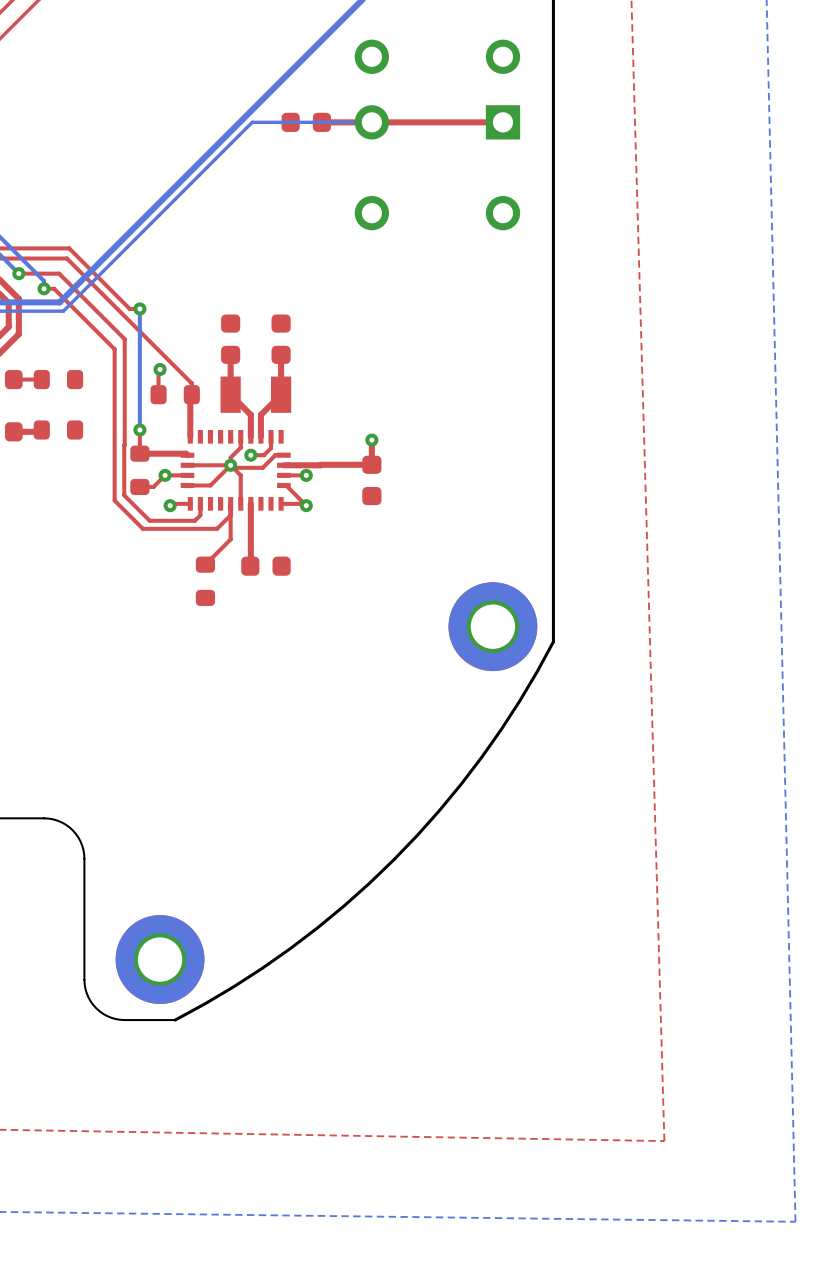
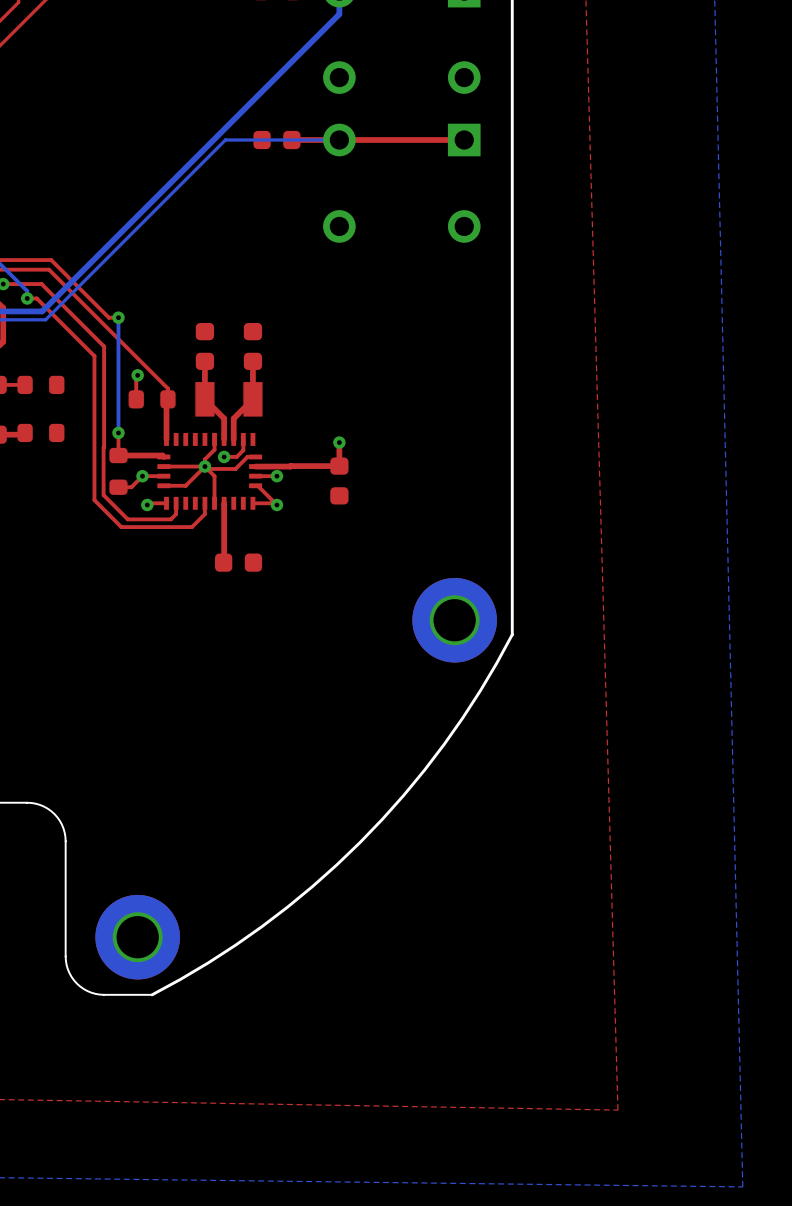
top track: (230, 515) (230, 539) (205, 564) -> none
part: (205, 581) -> none

